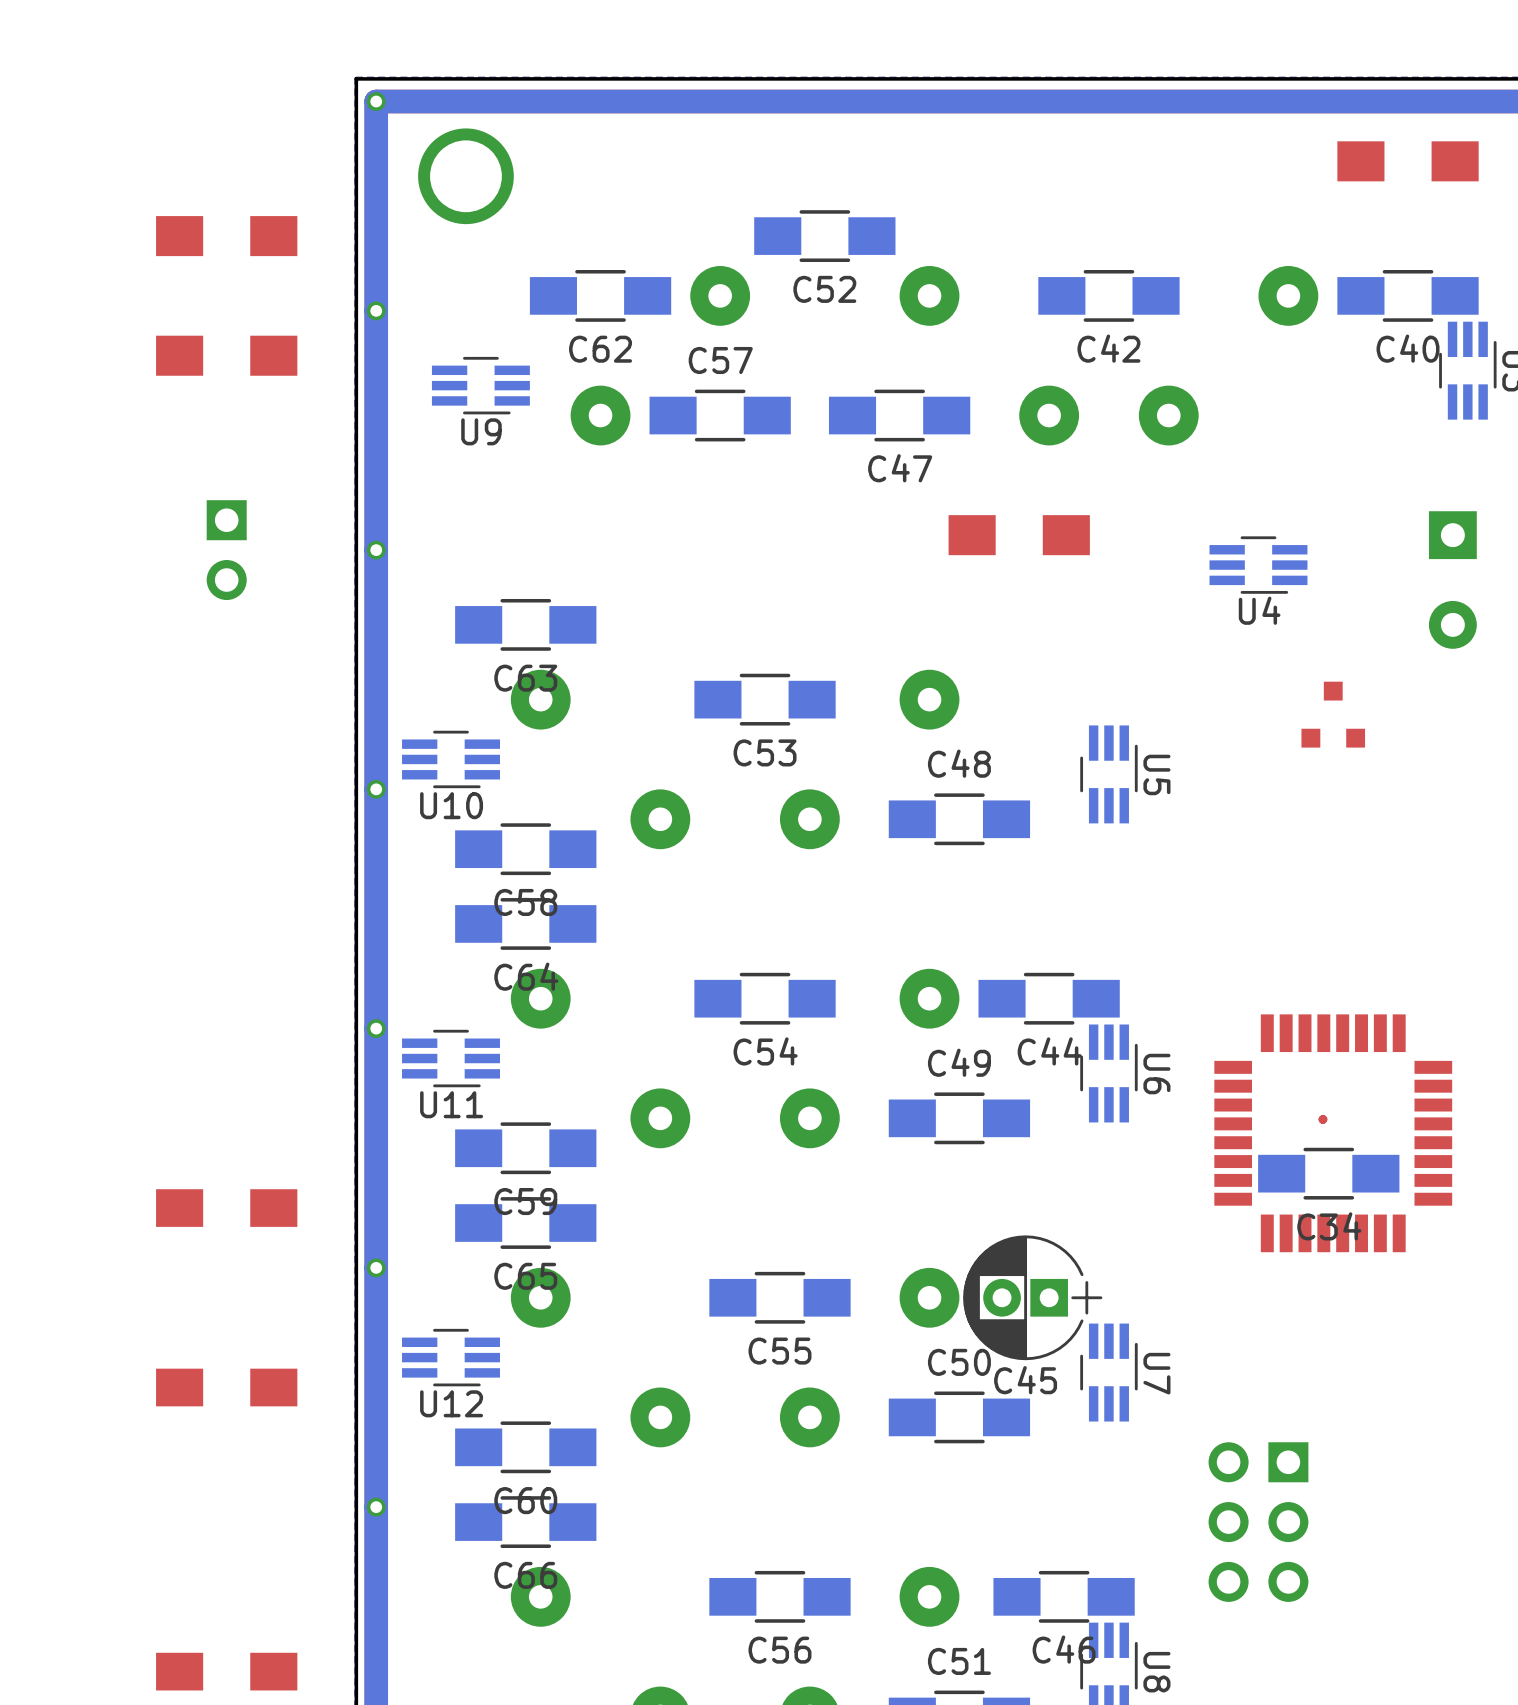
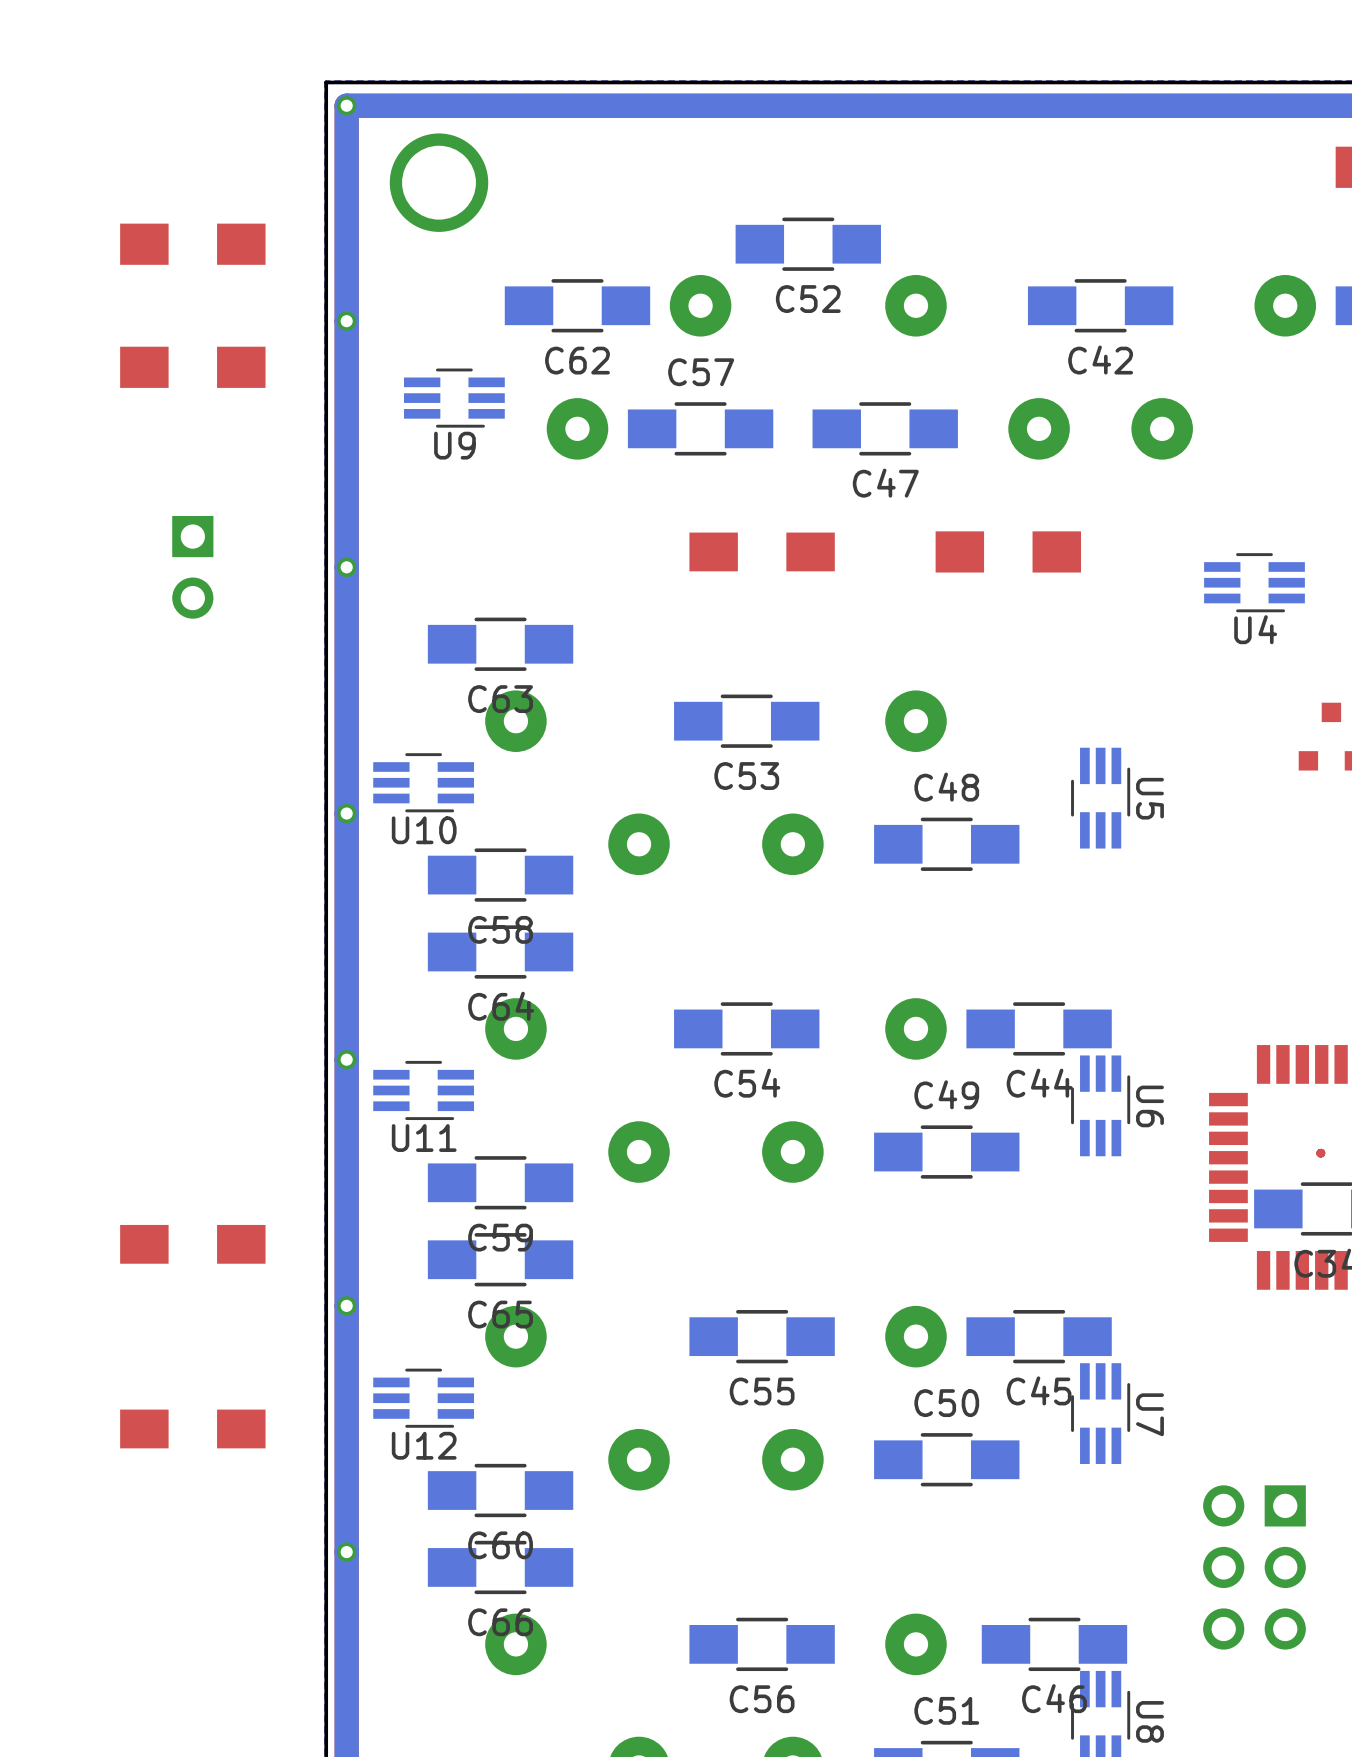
part: none -> (762, 551)
C45 footprint: [963, 1235, 1103, 1361] -> [966, 1310, 1112, 1364]
part: (226, 1671) -> none

